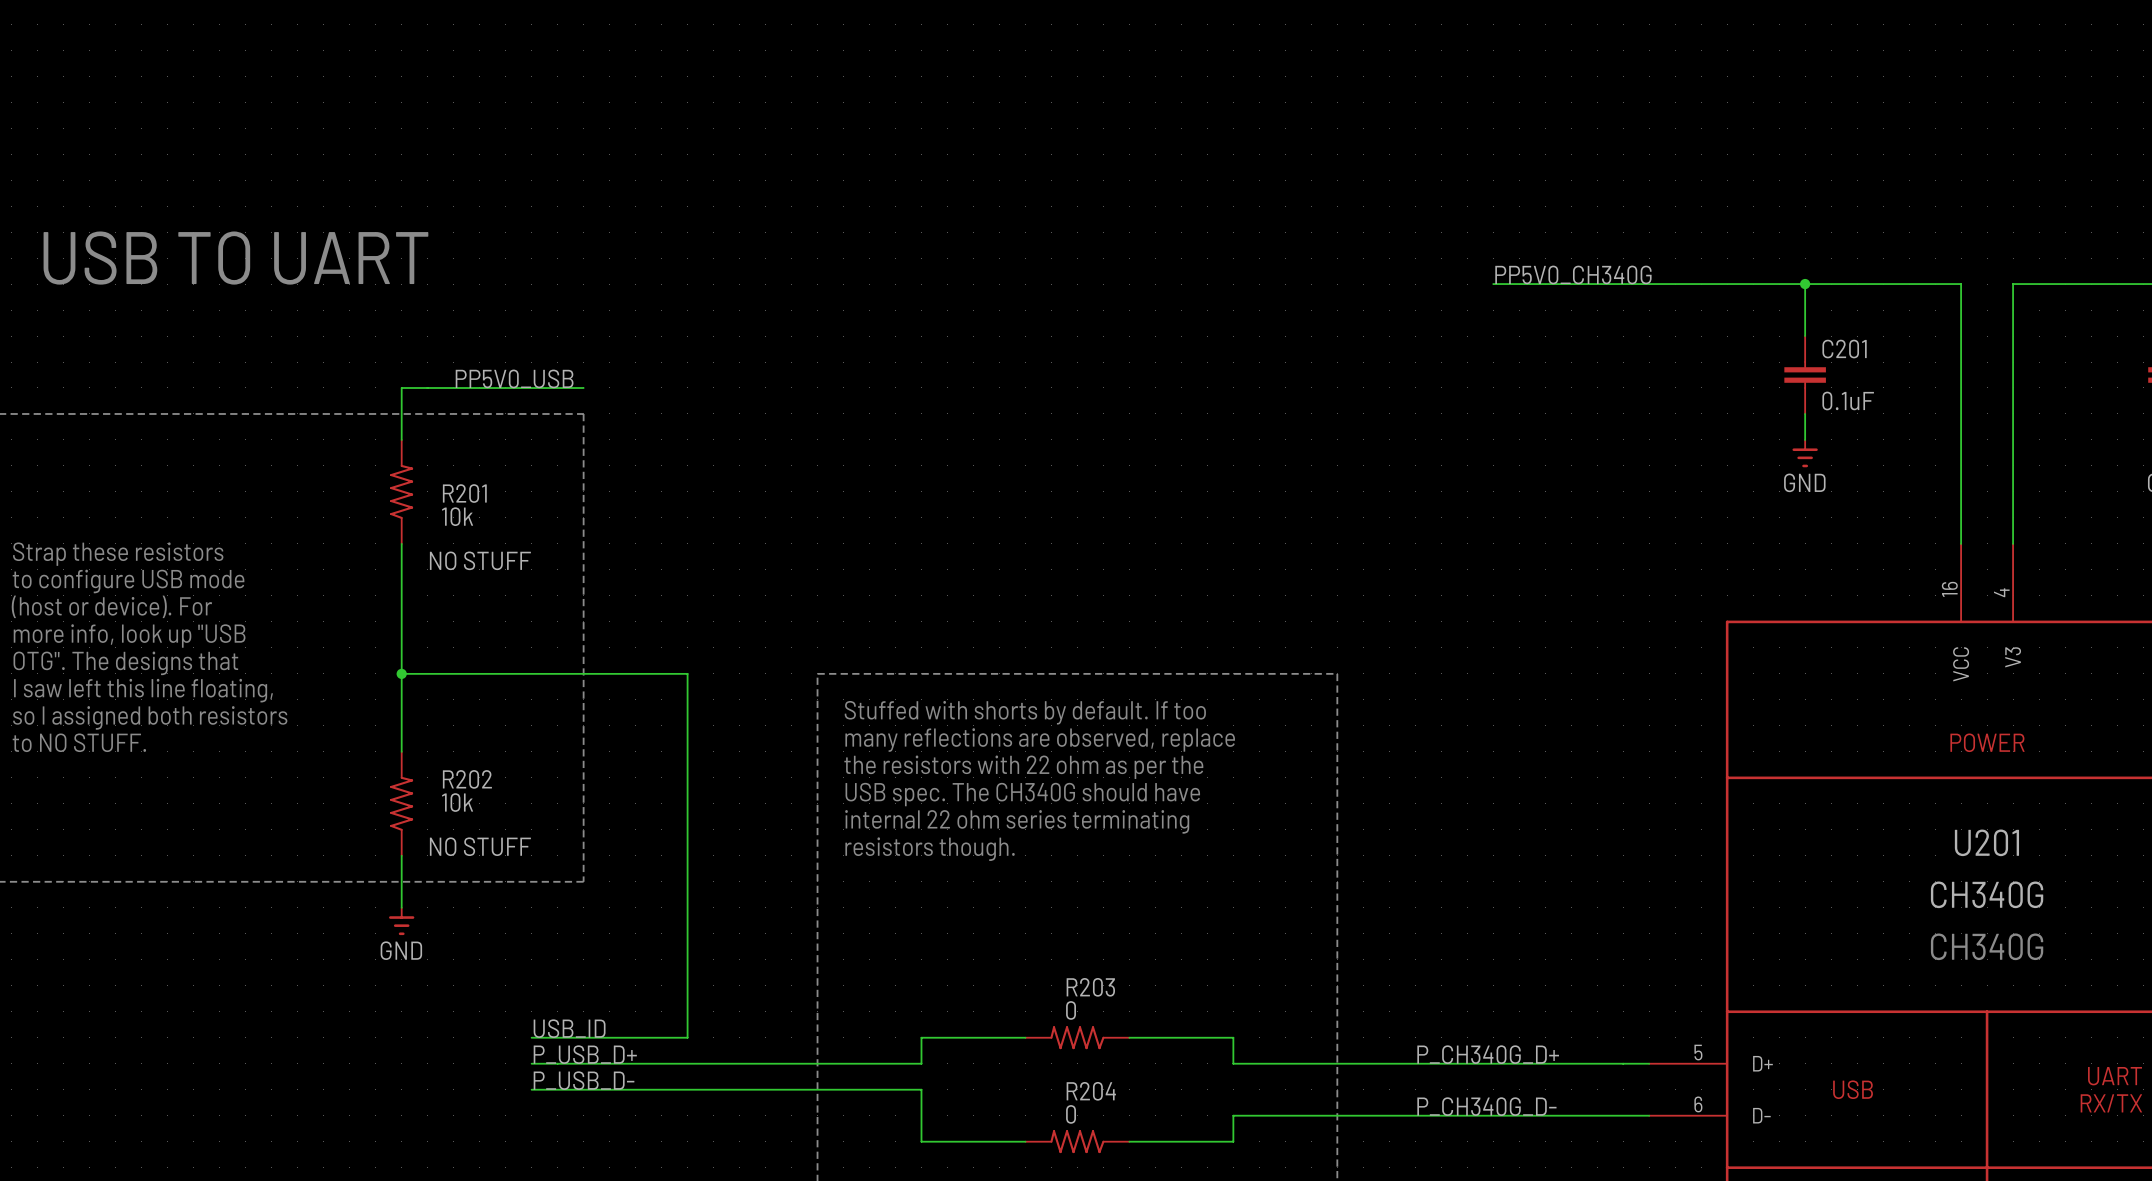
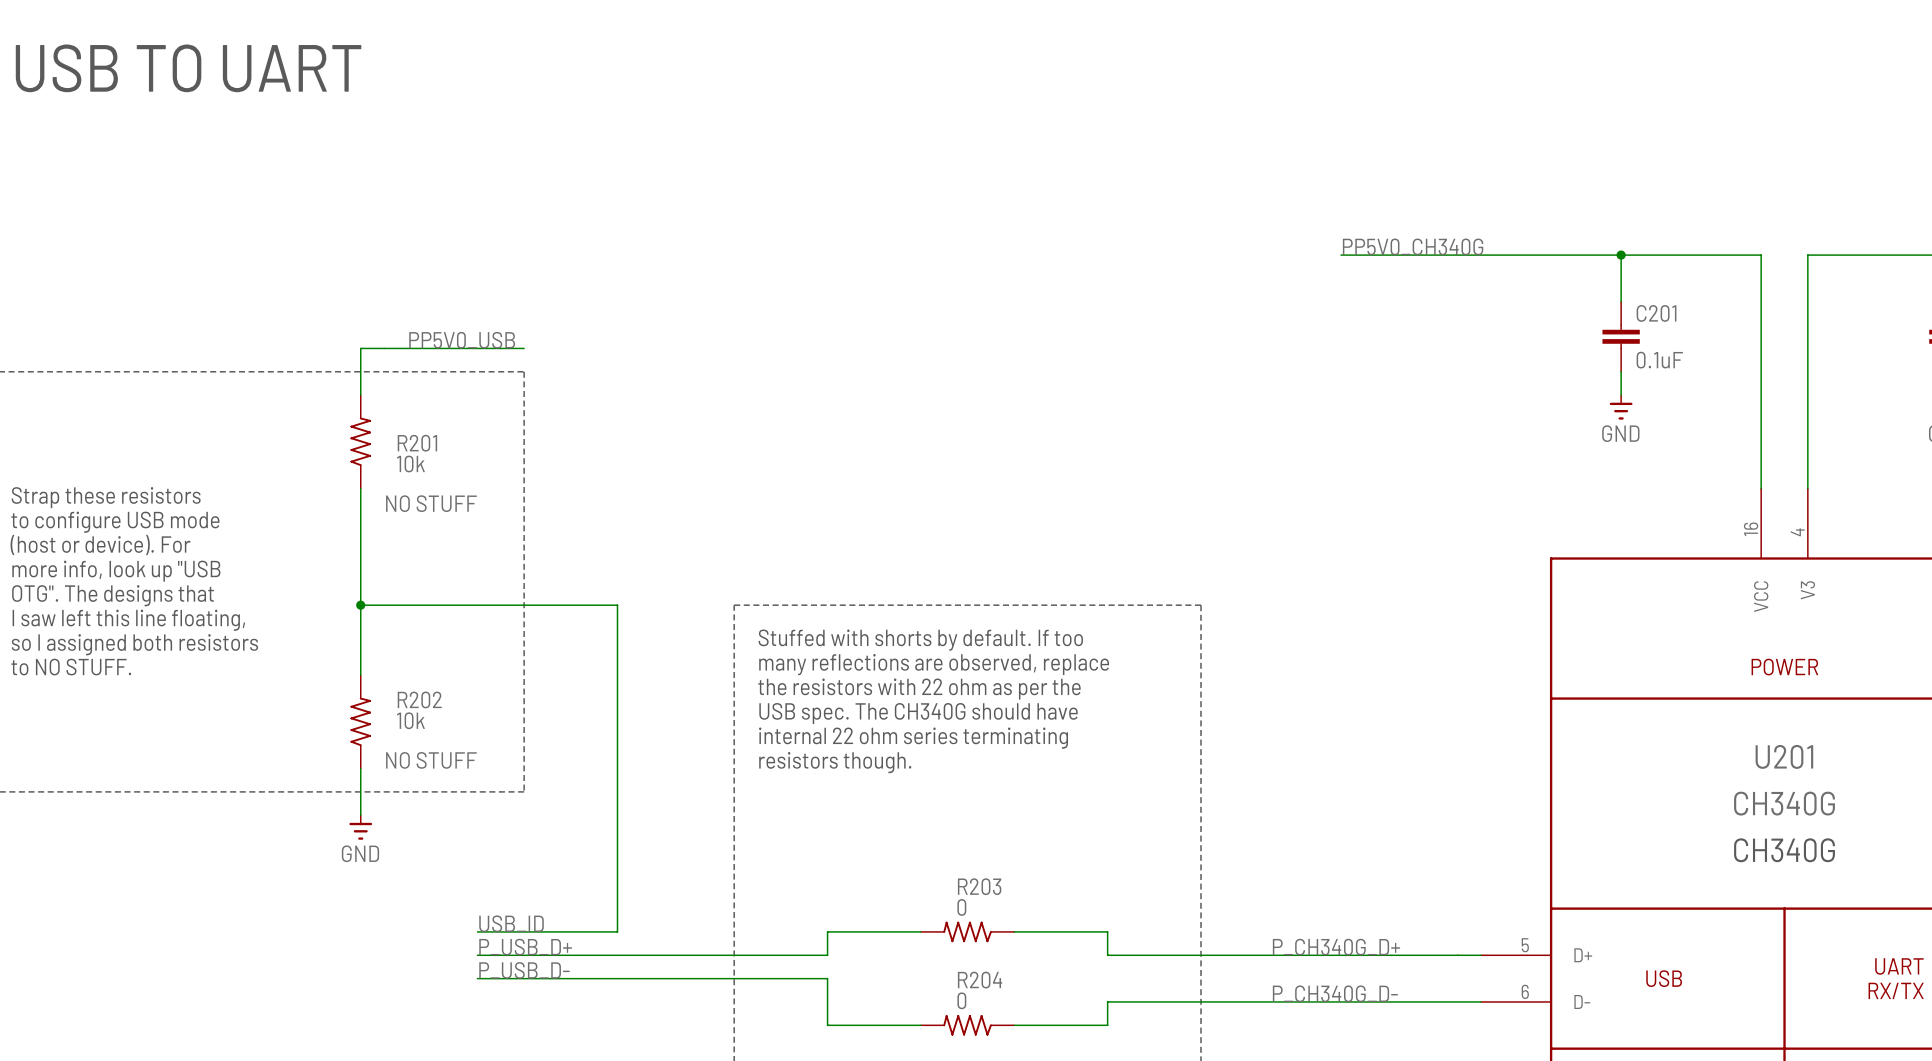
text position: USB TO UART (235, 258) -> USB TO UART (188, 68)

